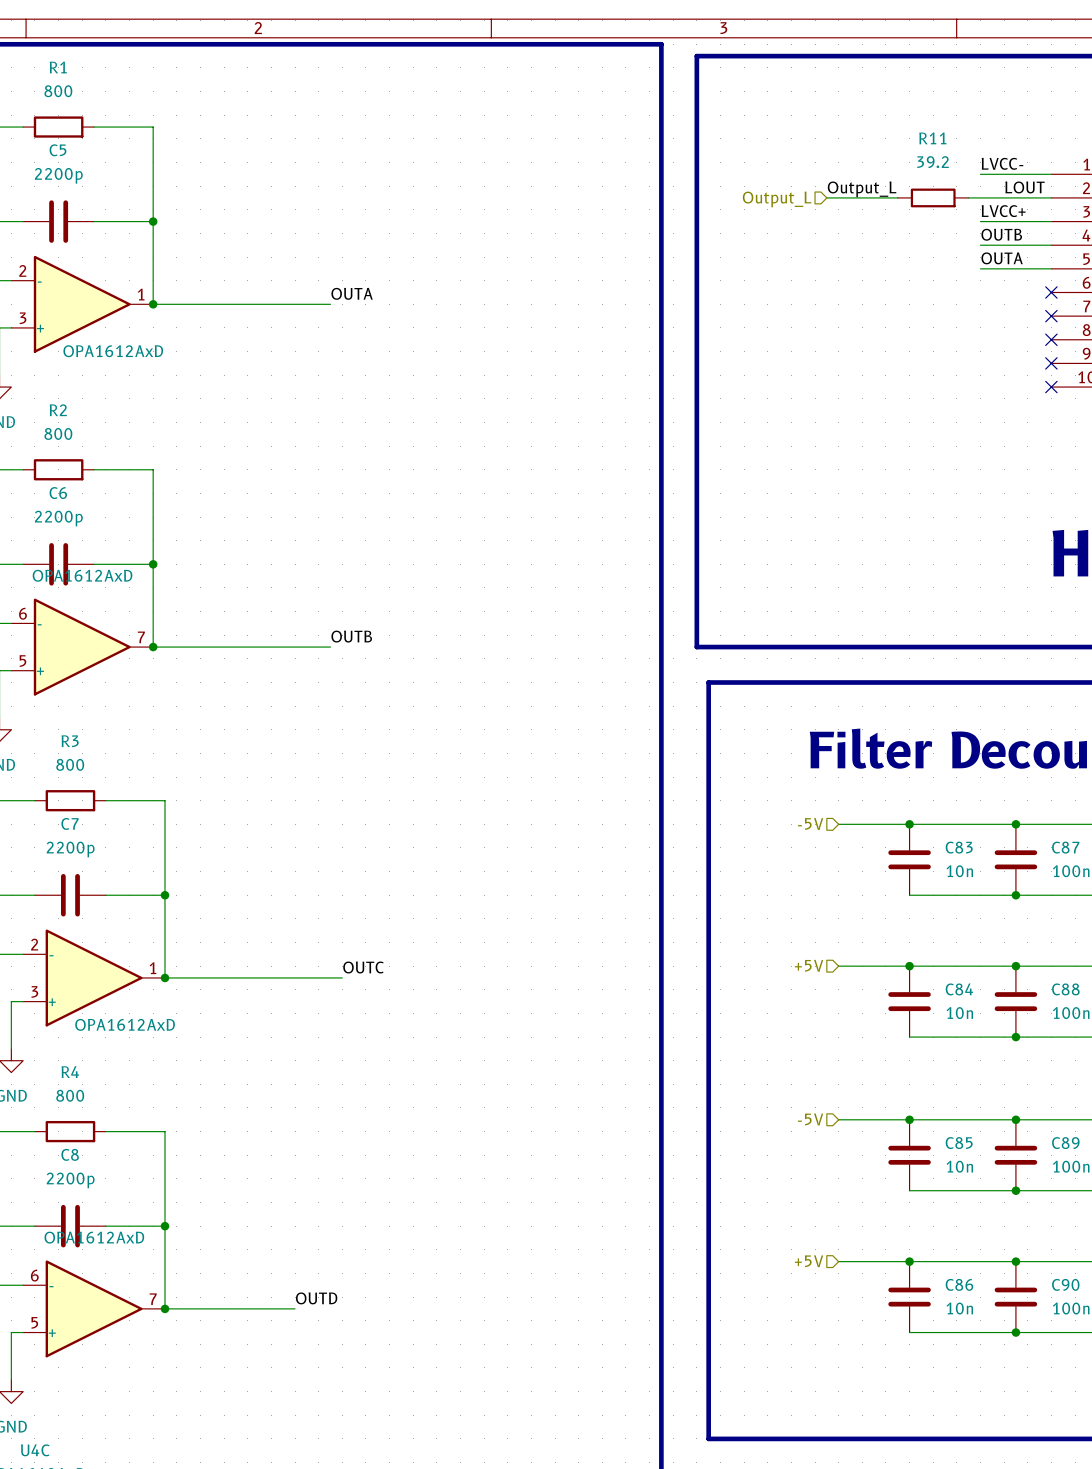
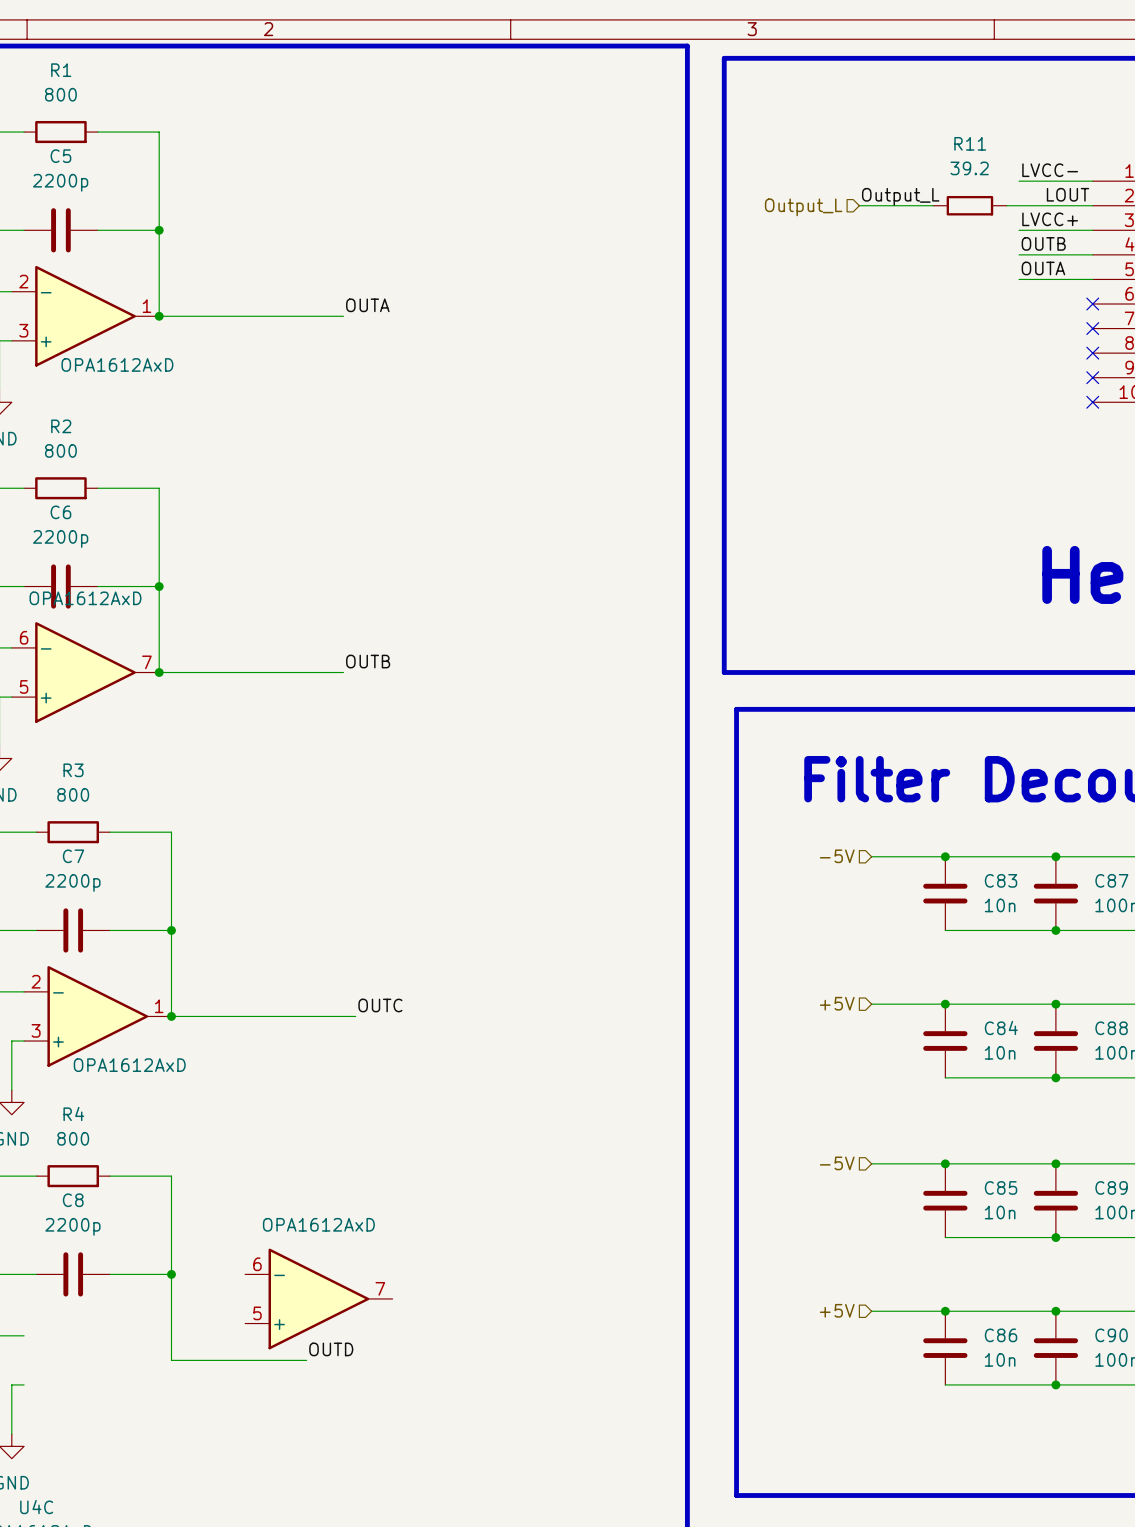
part position: (94, 1308) -> (318, 1298)
junction: (165, 1308) -> none

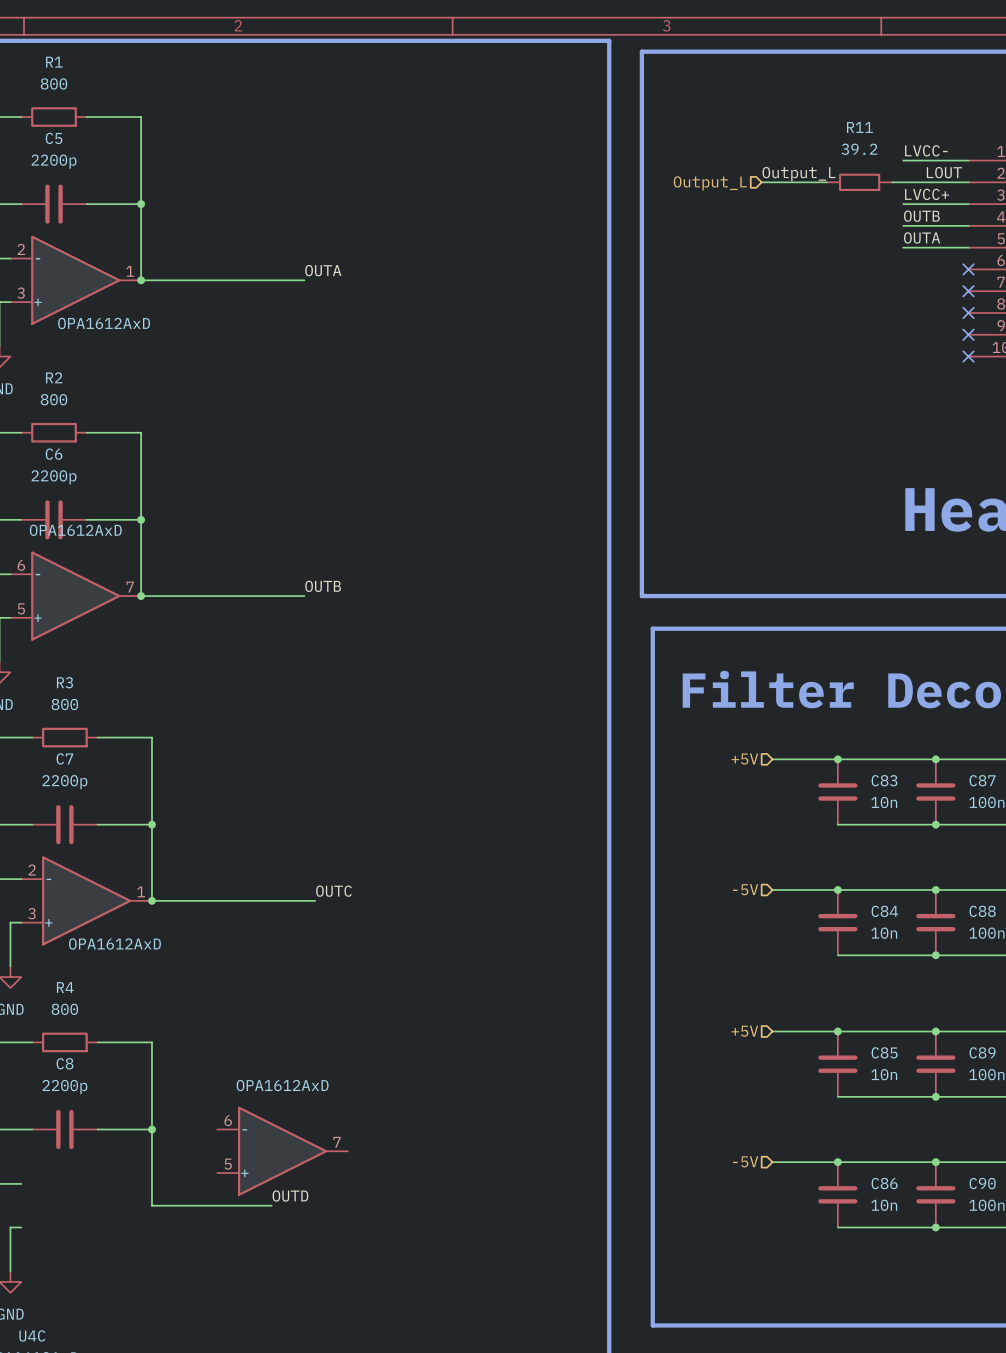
hierarchical label: -5V (837, 856) -> +5V (744, 759)
hierarchical label: +5V (837, 1003) -> -5V (745, 889)
hierarchical label: -5V (837, 1163) -> +5V (744, 1031)
hierarchical label: +5V (837, 1310) -> -5V (745, 1161)

